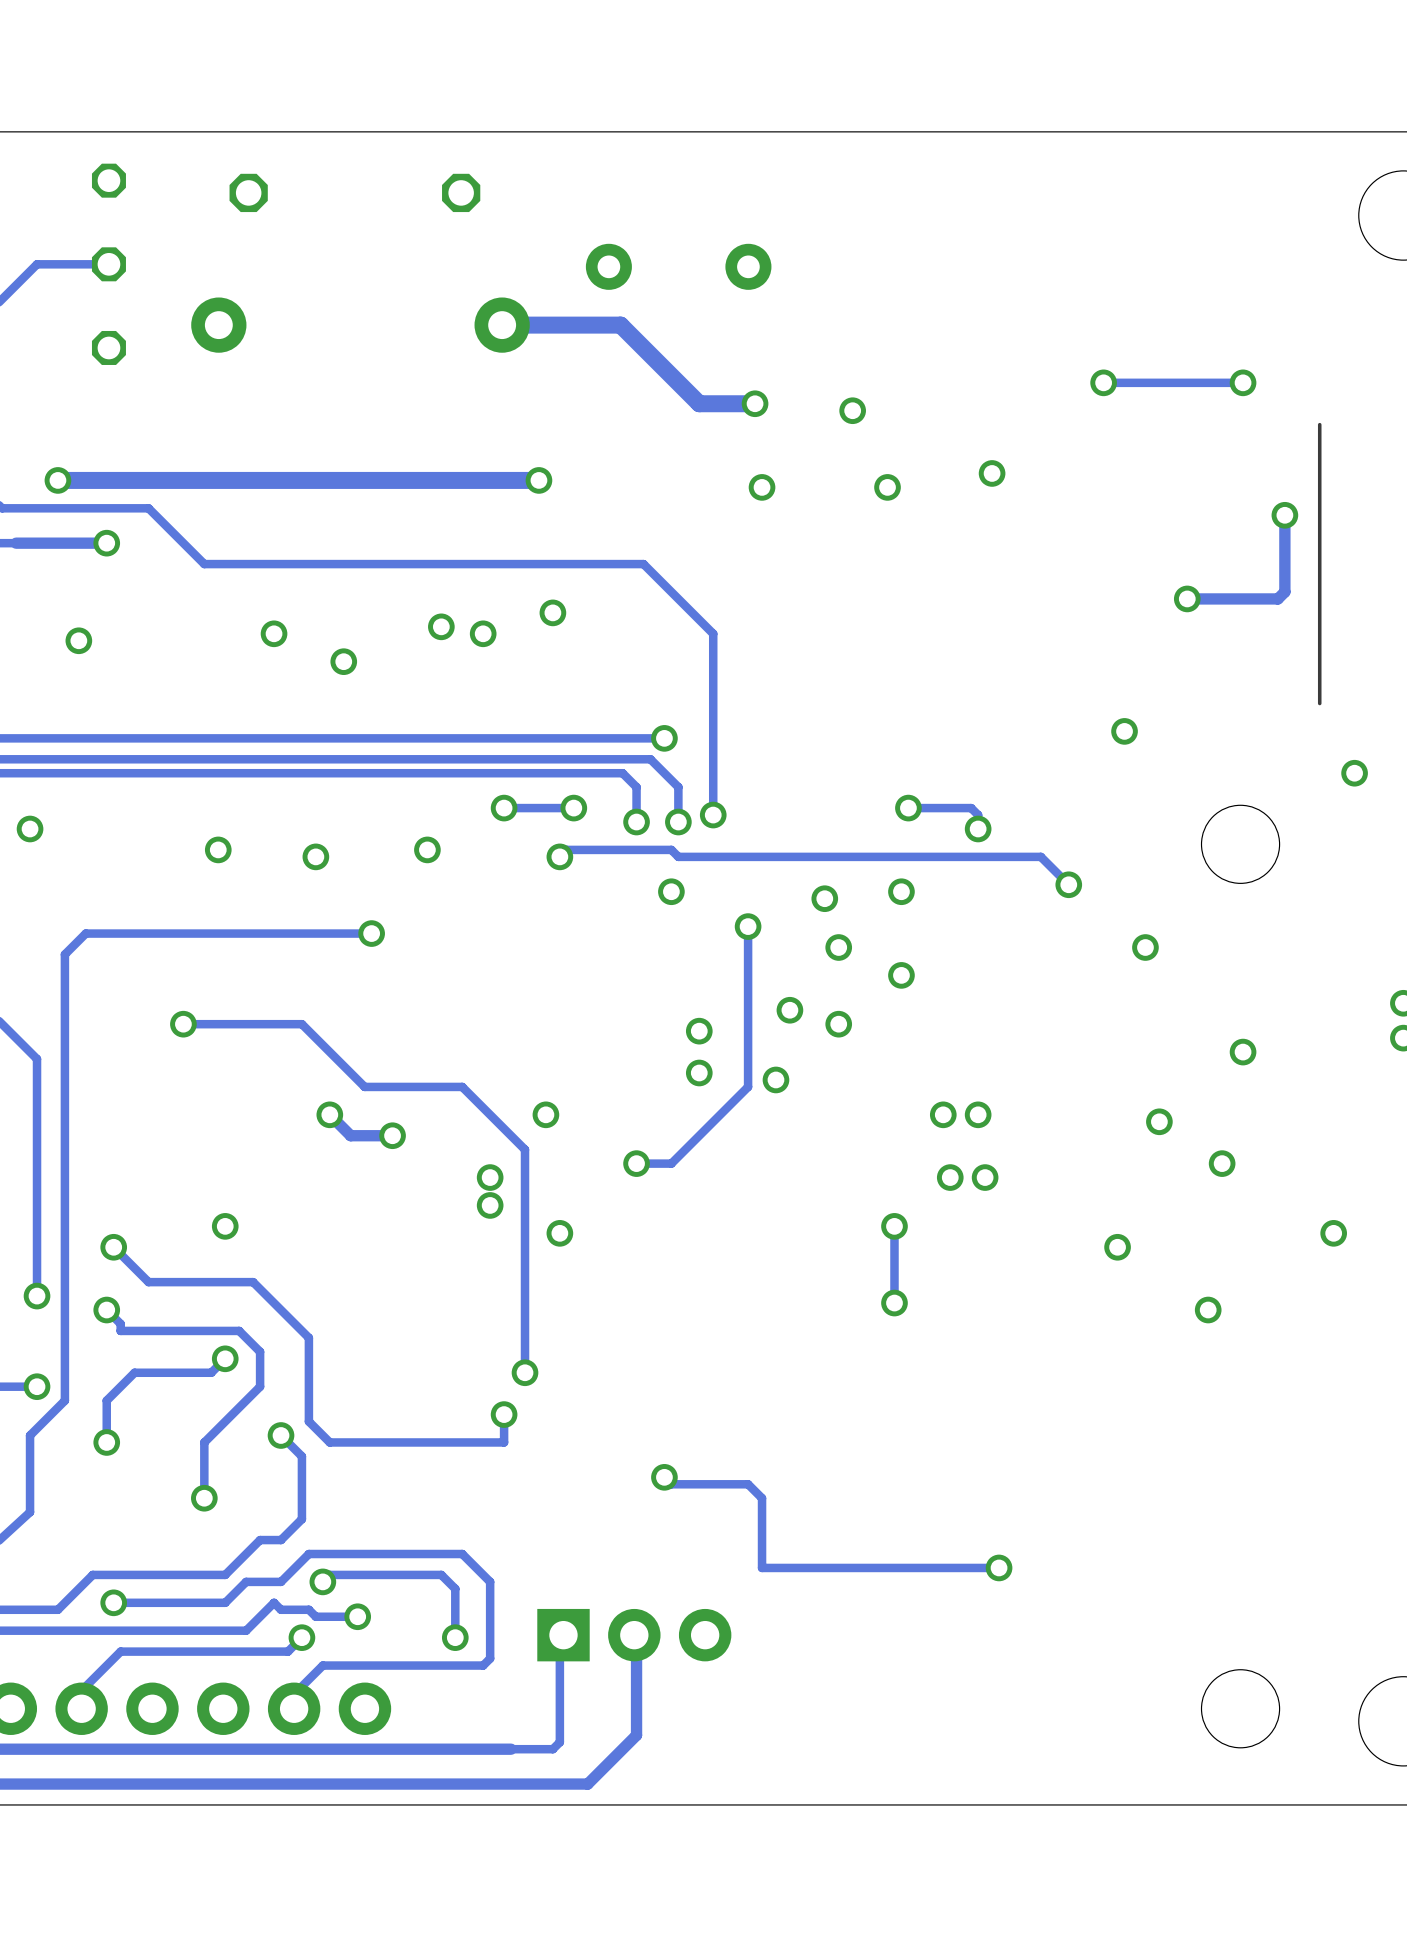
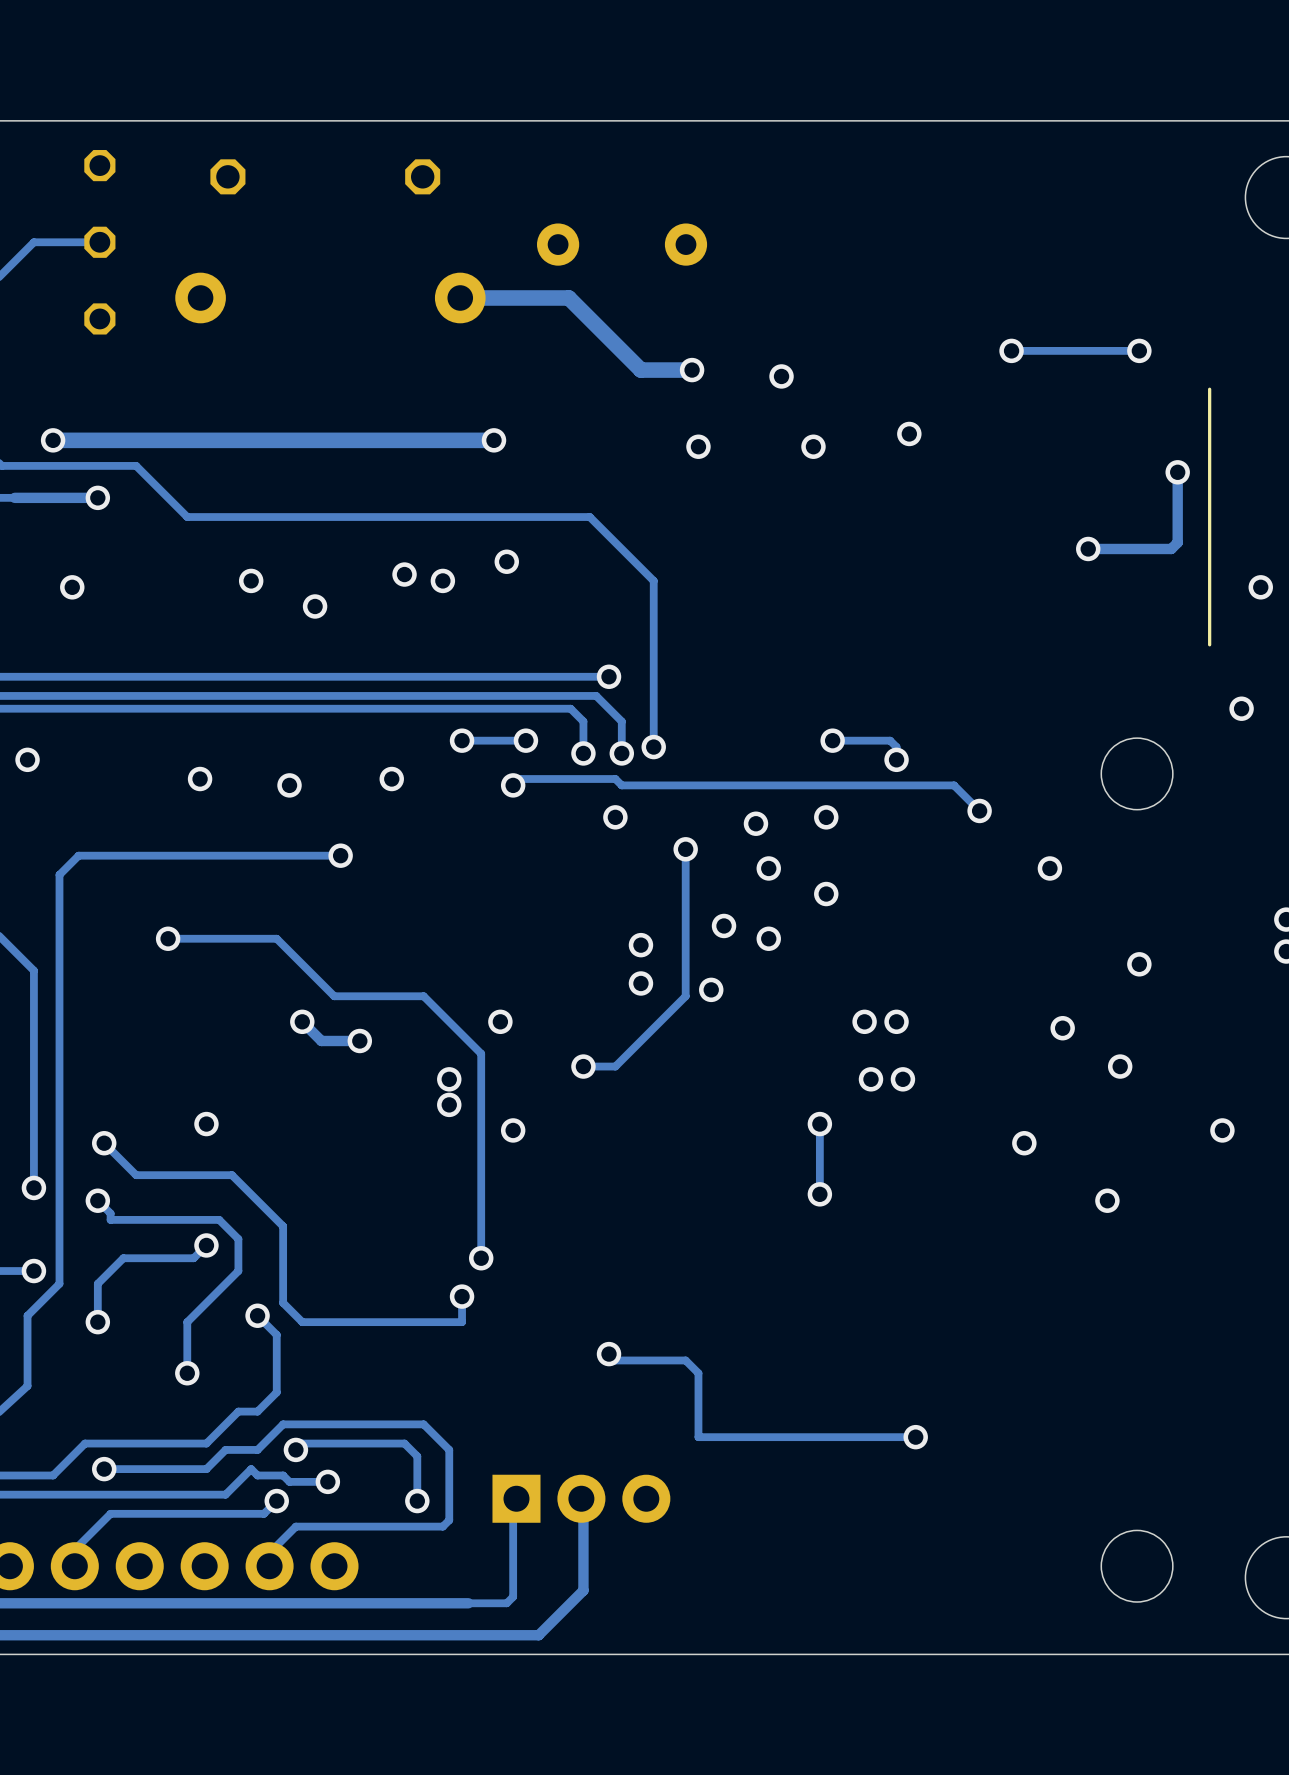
via: none -> (1260, 587)
via: (1124, 731) -> none

